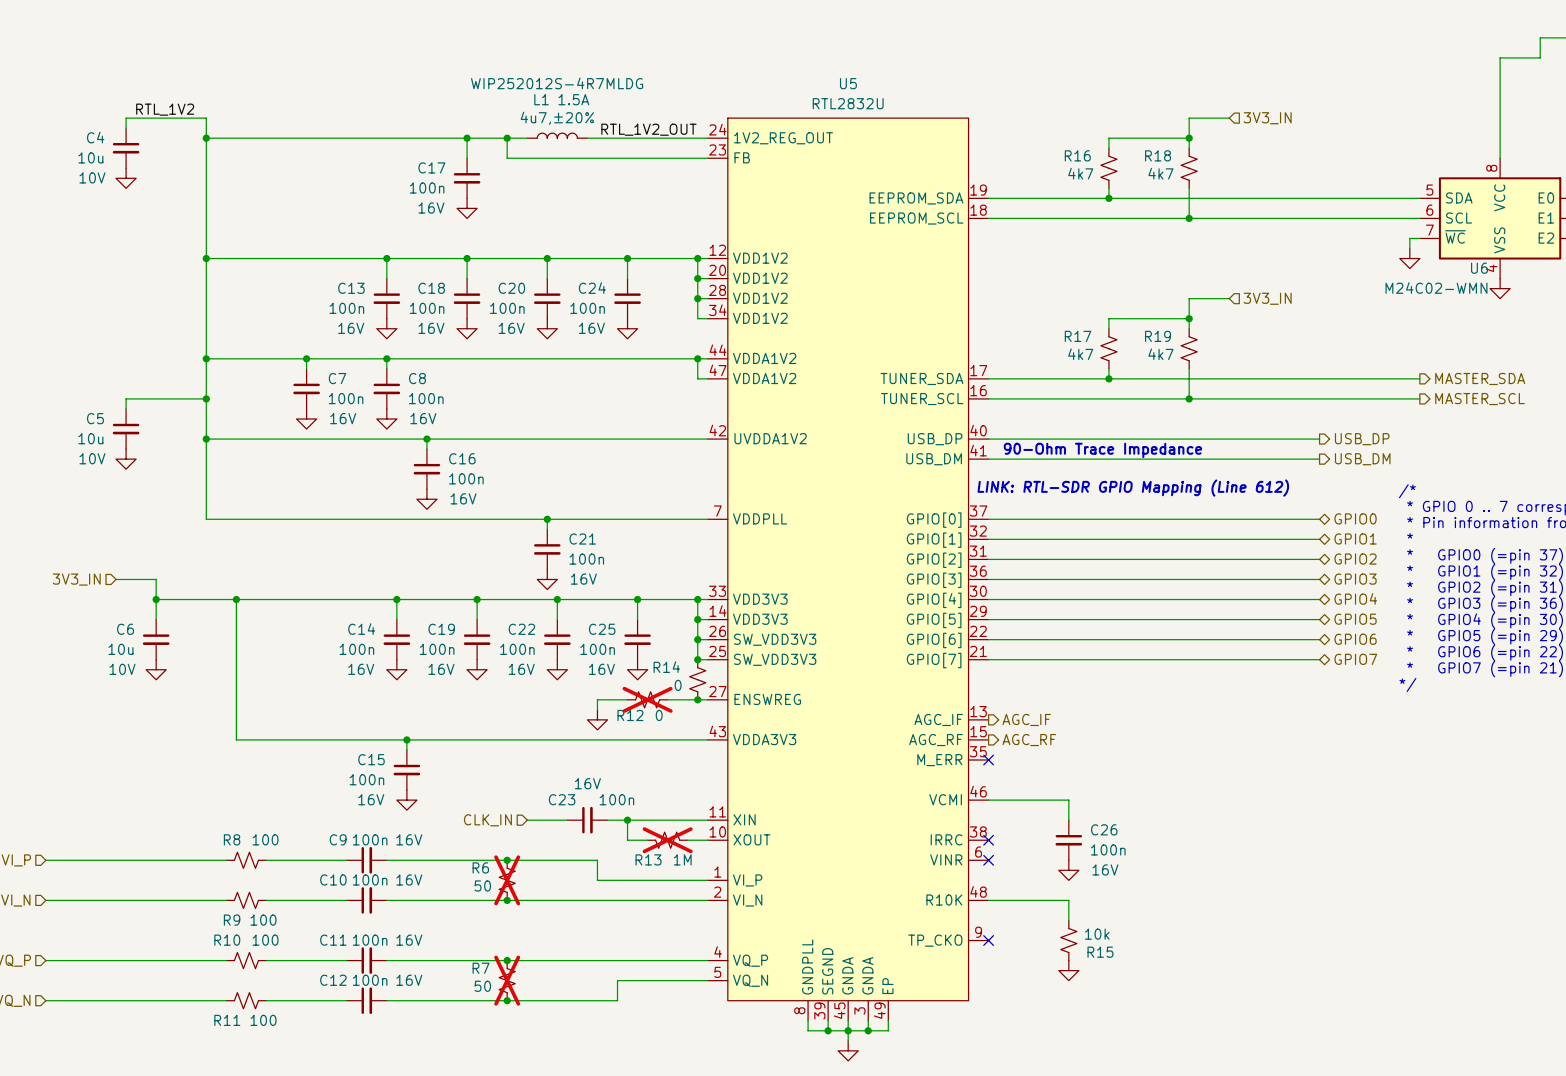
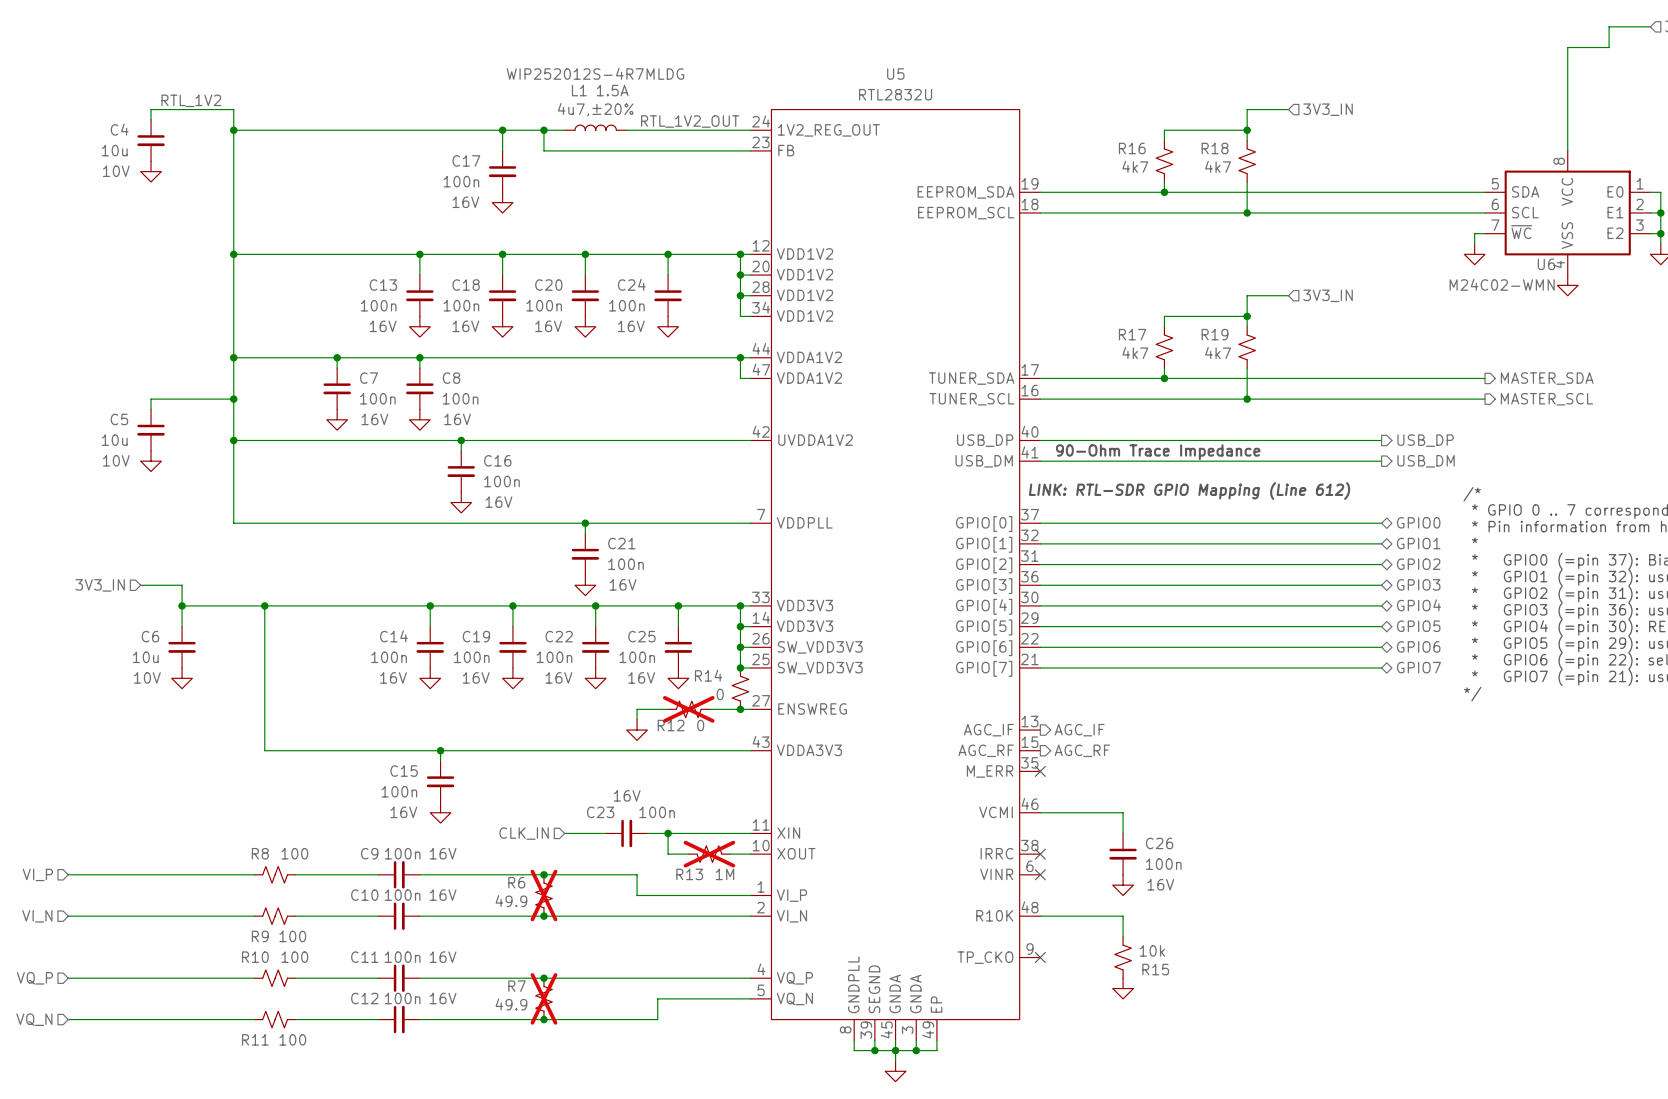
R6 value: 50 (482, 885) -> 49.9 (511, 901)
R7 value: 50 (482, 986) -> 49.9 (511, 1004)

